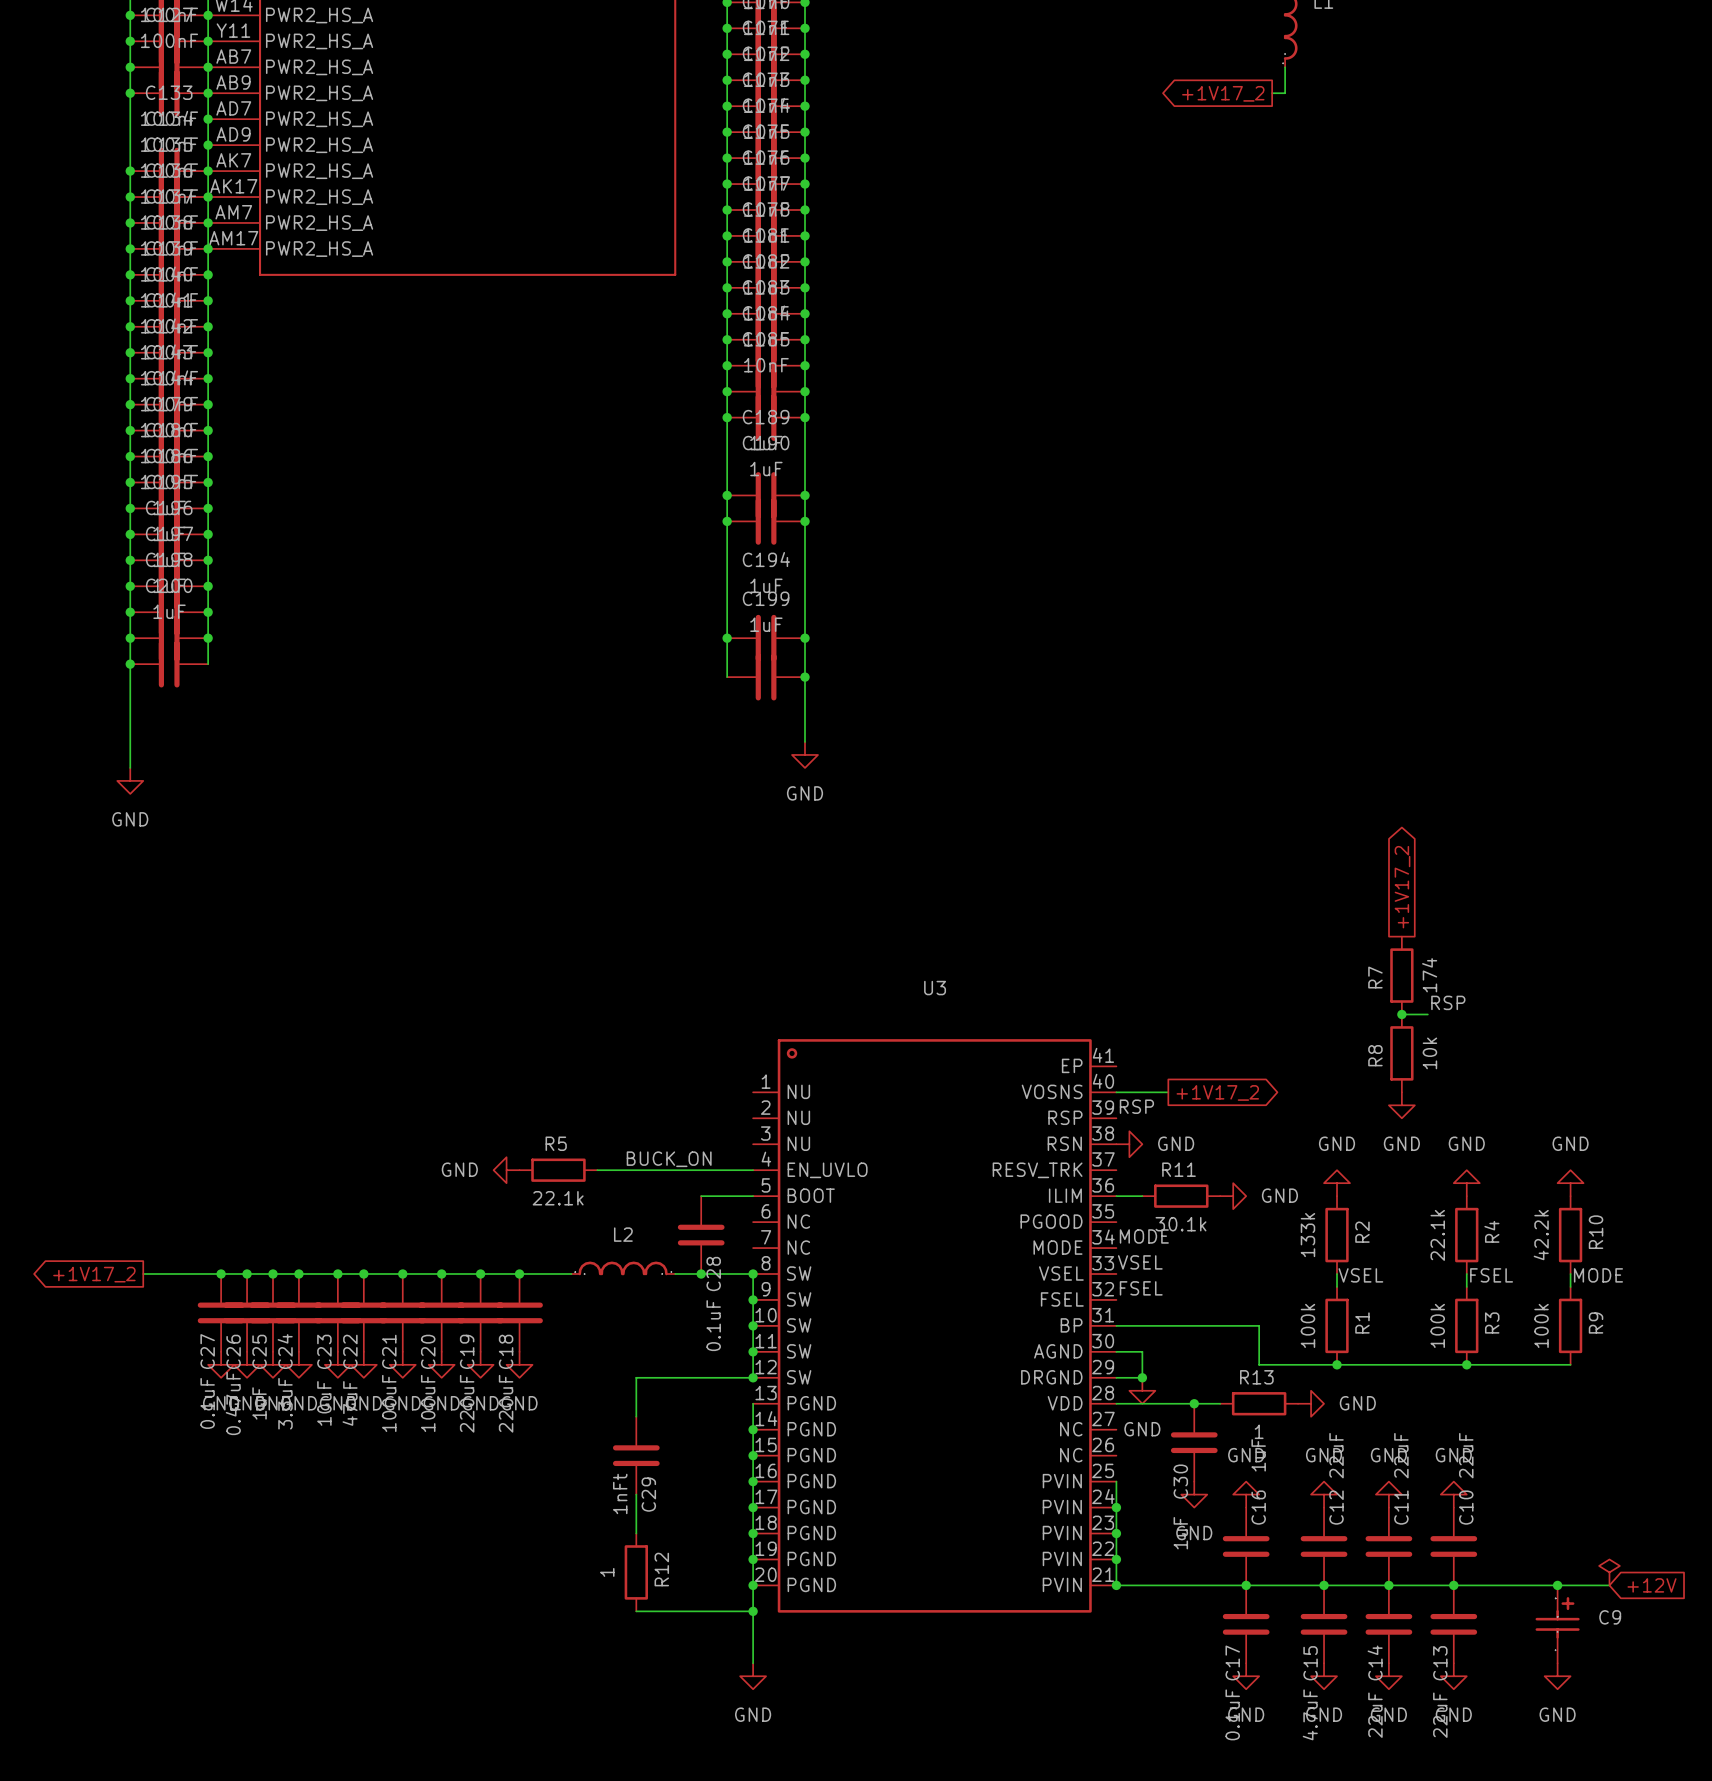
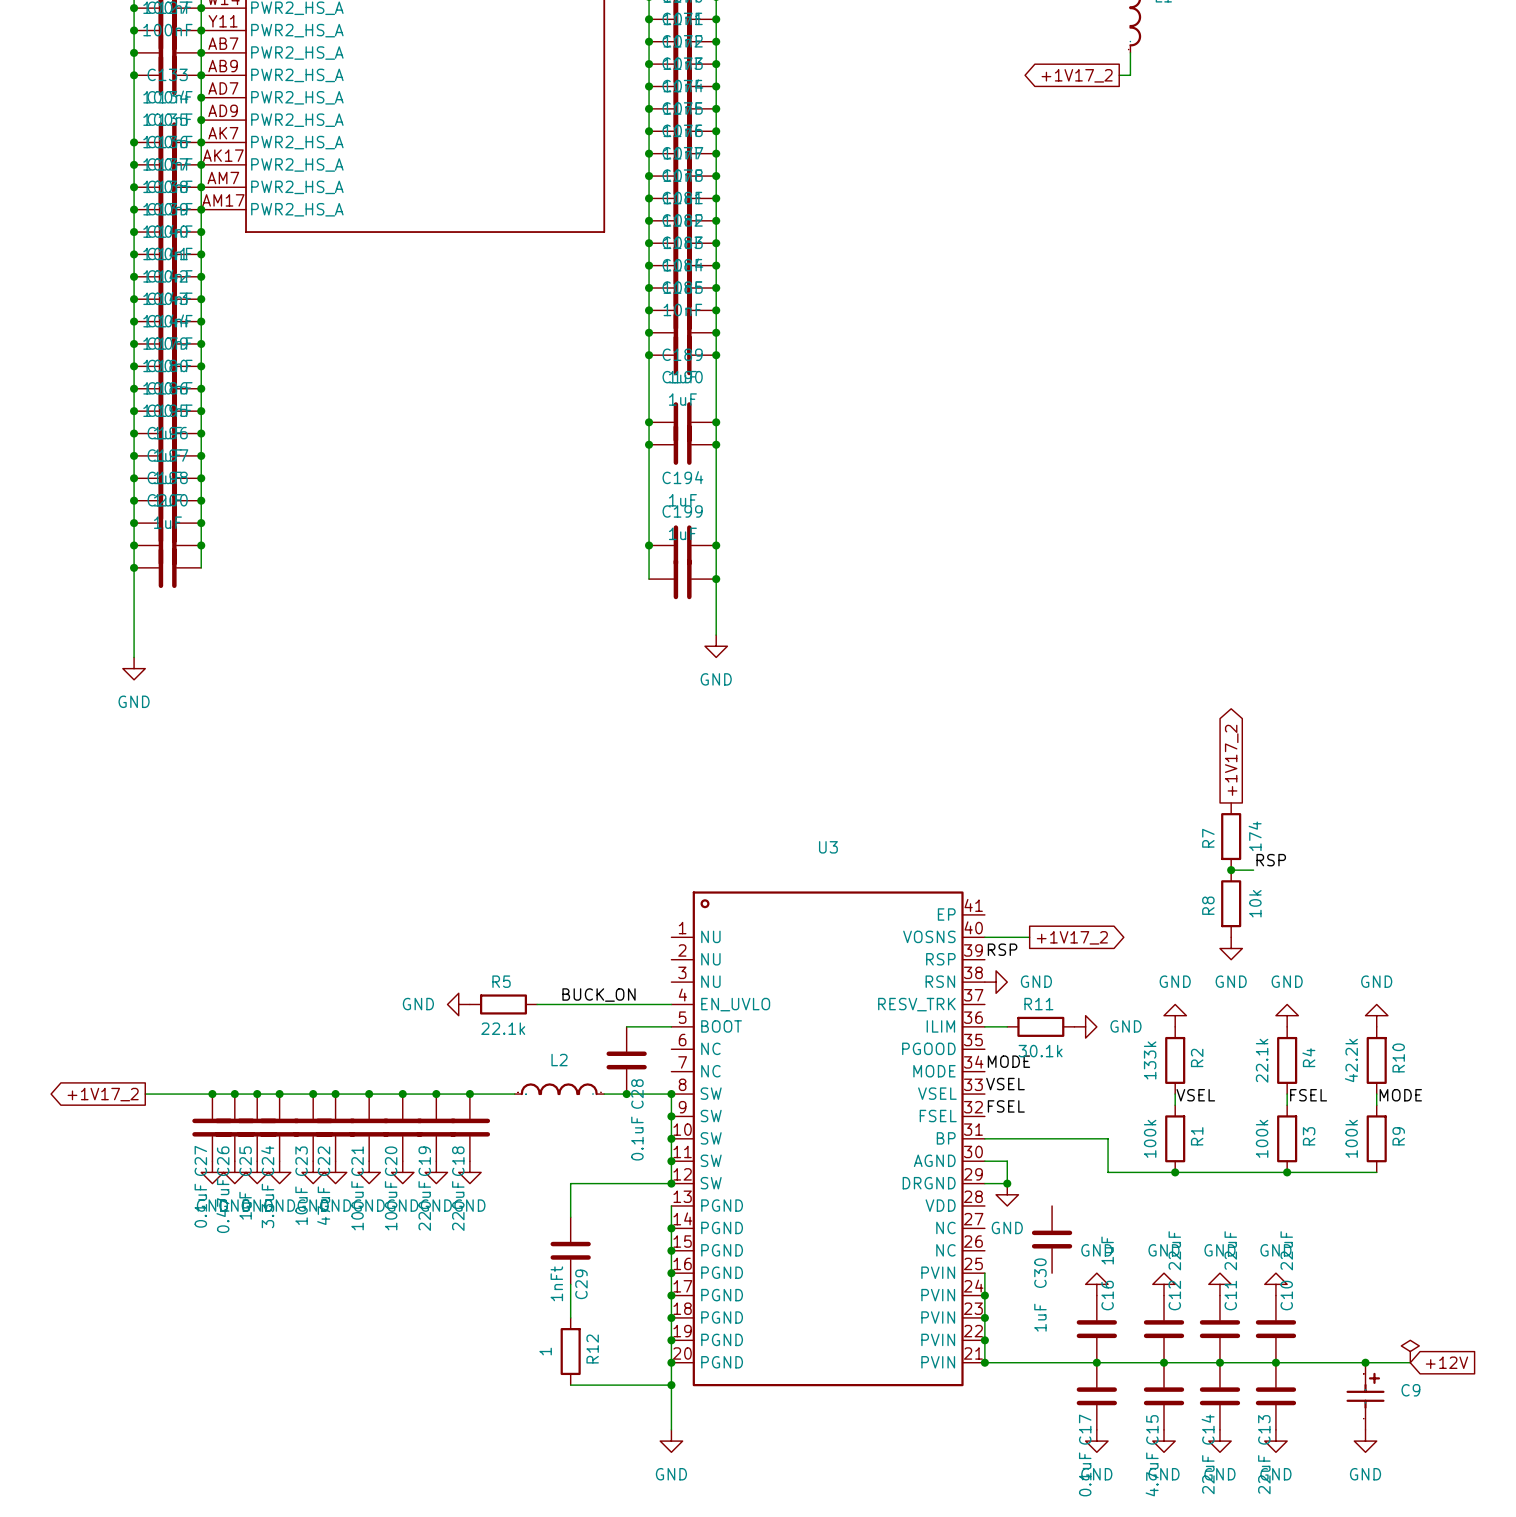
wire: (1116, 1403) (1220, 1403) -> none
junction: (1194, 1403) -> none
R13: 1 (1259, 1403) -> none
power symbol: GND (1311, 1403) -> none
power symbol: GND (1194, 1494) -> none

